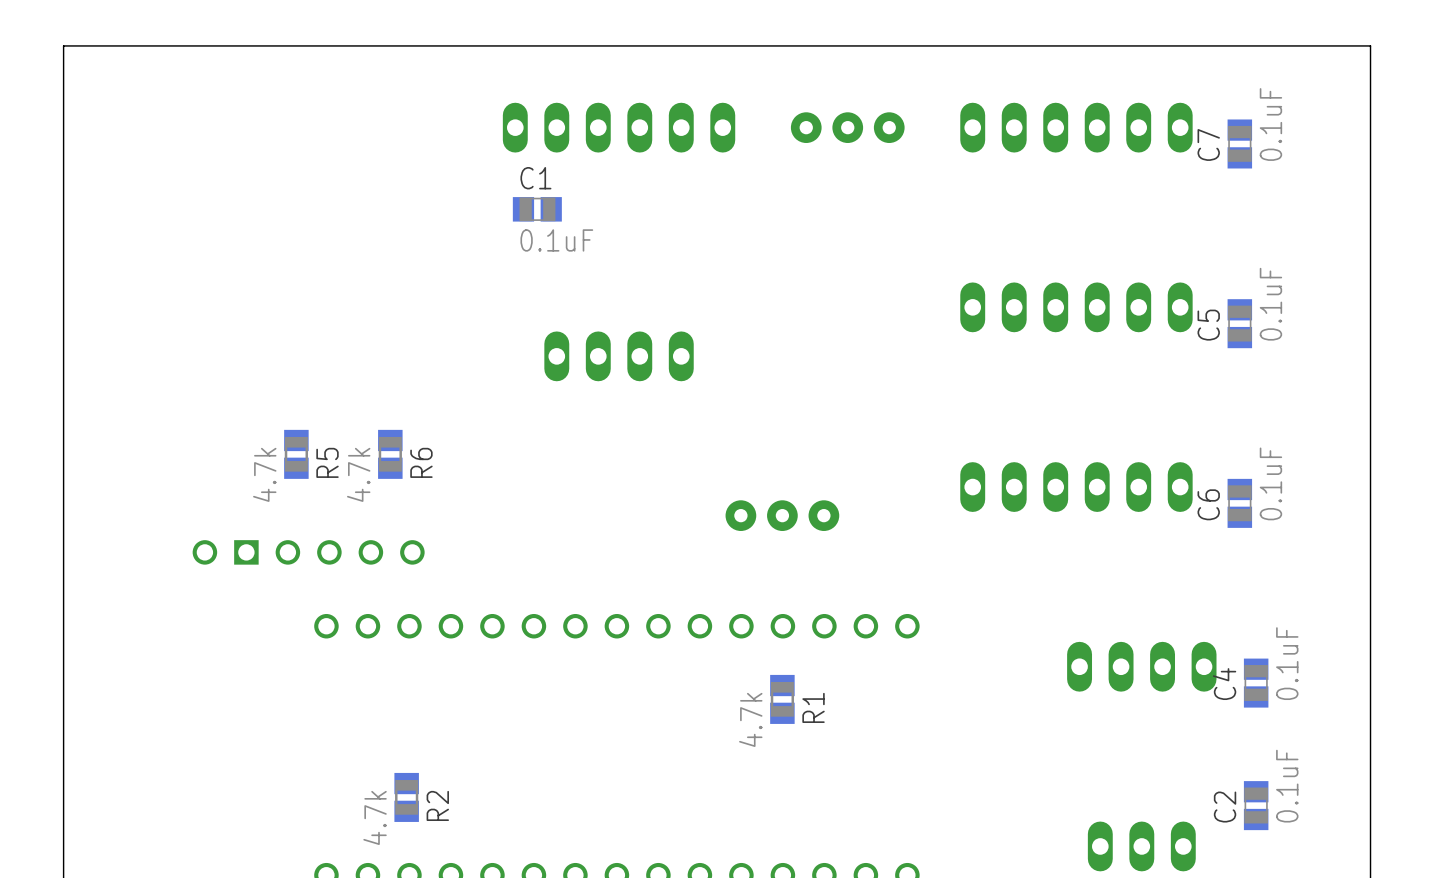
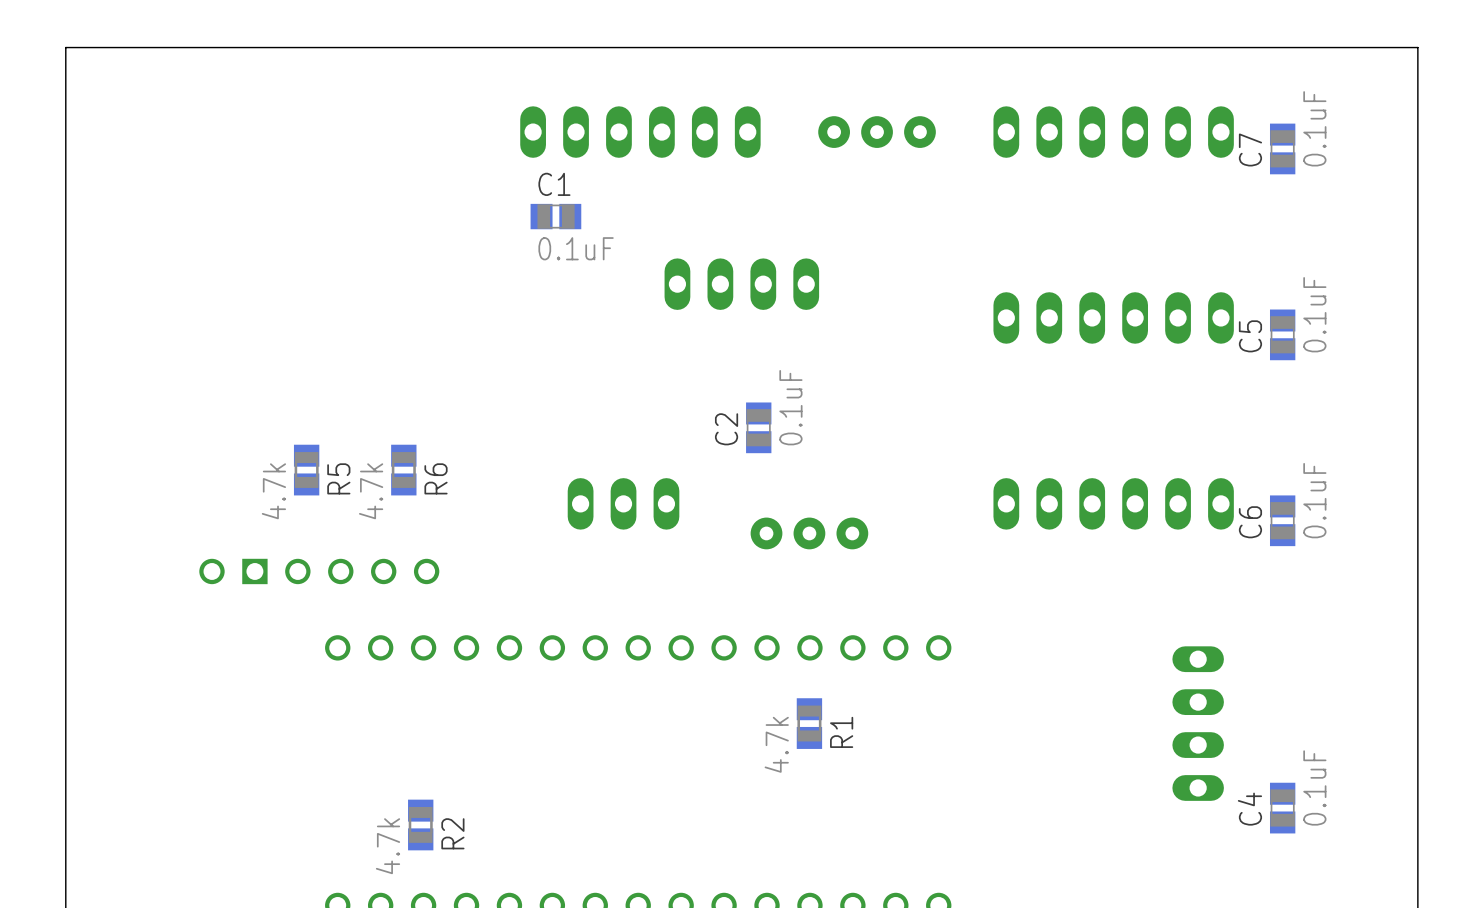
part position: (619, 356) -> (741, 284)
part: none -> (623, 503)
part rotation: 0° (1141, 666) -> 90° clockwise (1198, 723)
C4 position: (1256, 683) -> (1282, 808)
C2 position: (1256, 805) -> (758, 427)
part: (1141, 846) -> none

